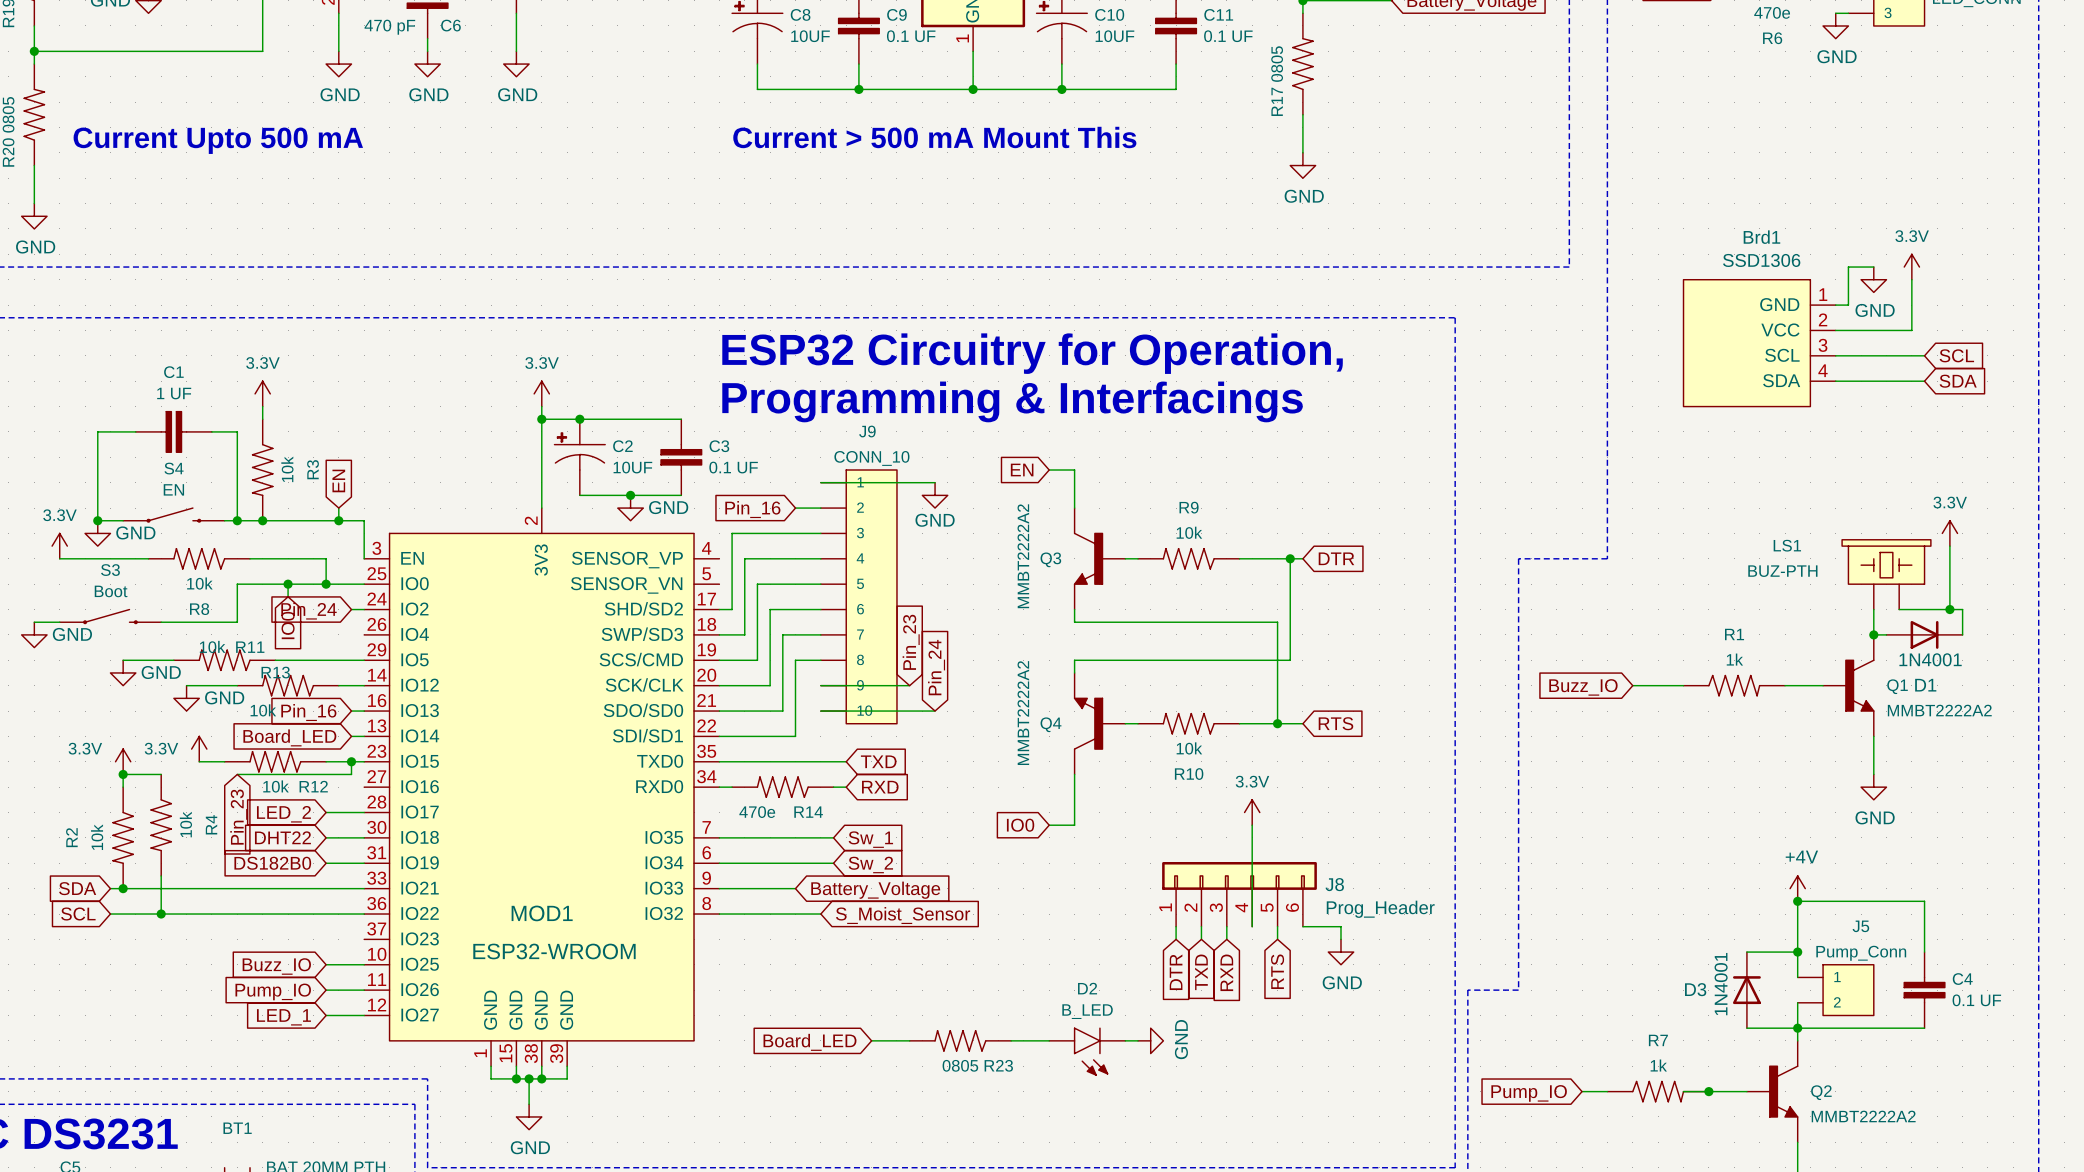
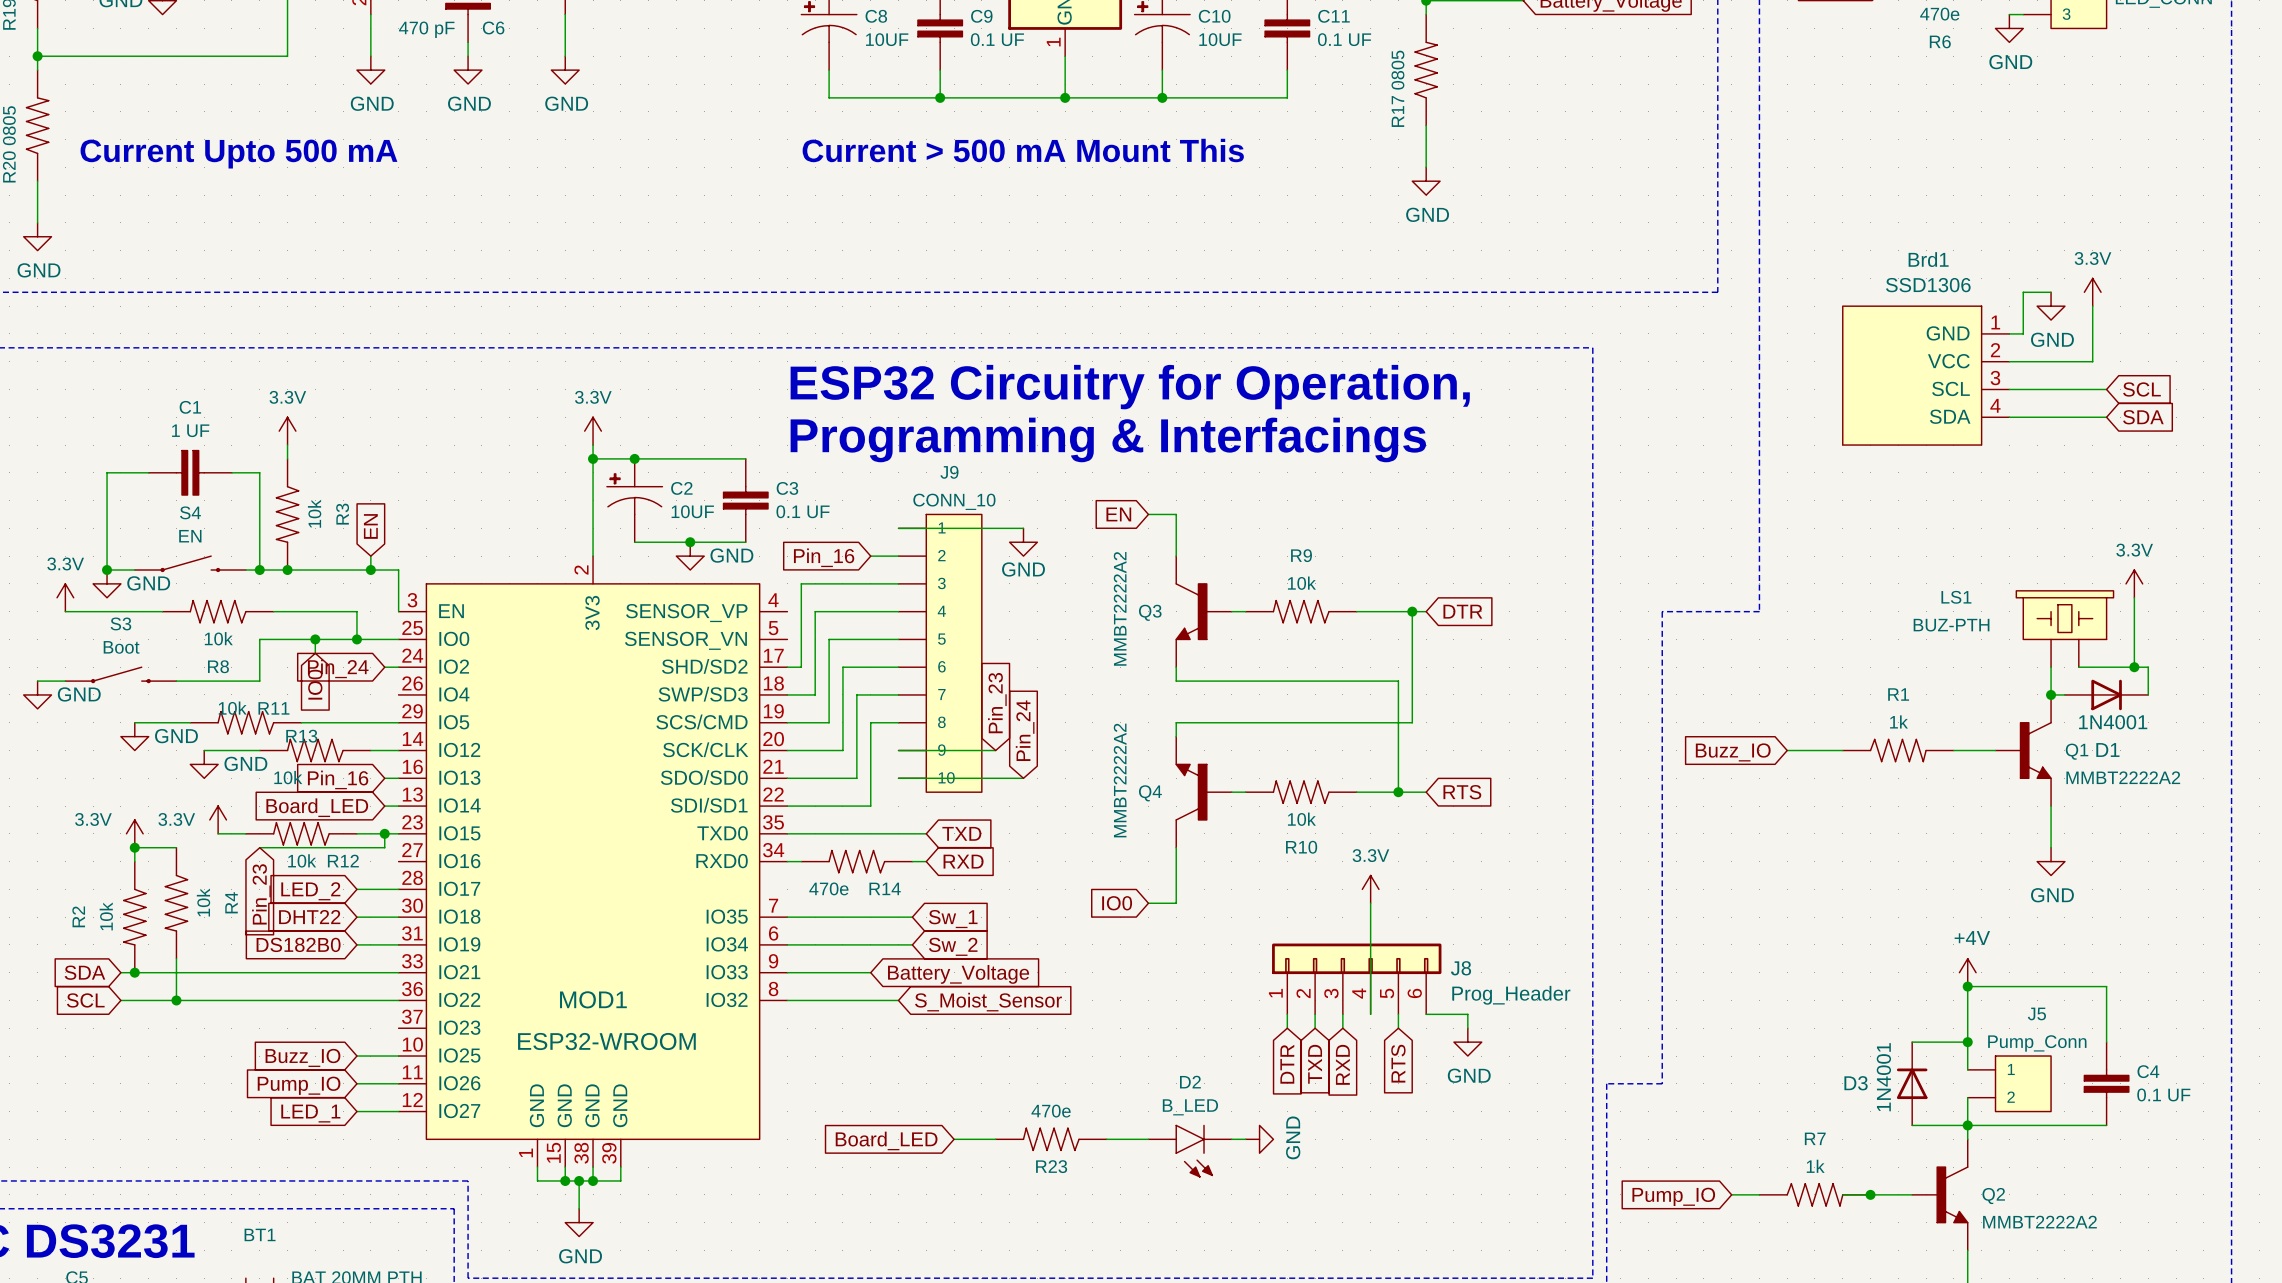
R23 value: 0805 (960, 1065) -> 470e (1051, 1111)
R23 name position: R23 (998, 1065) -> R23 (1051, 1166)

